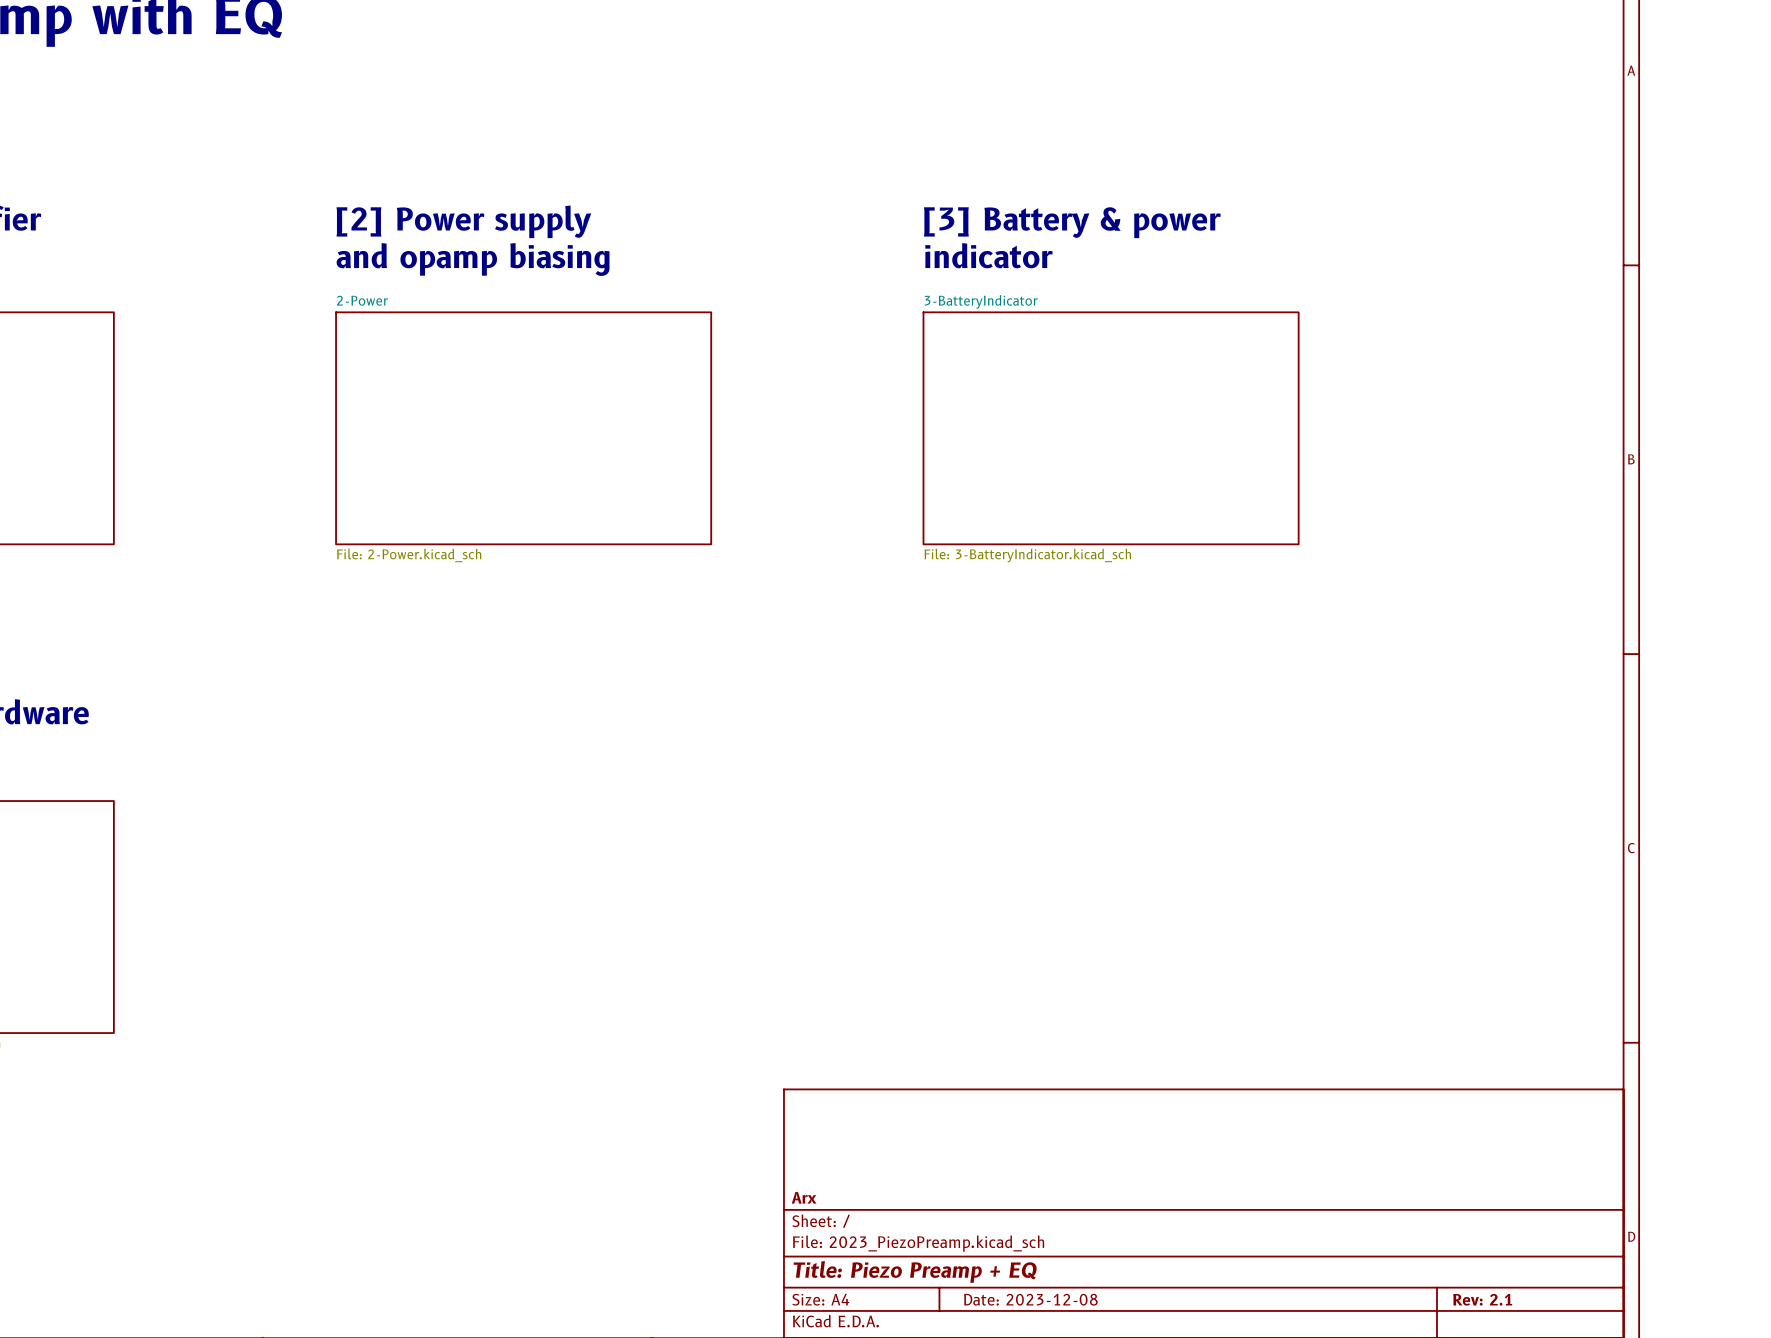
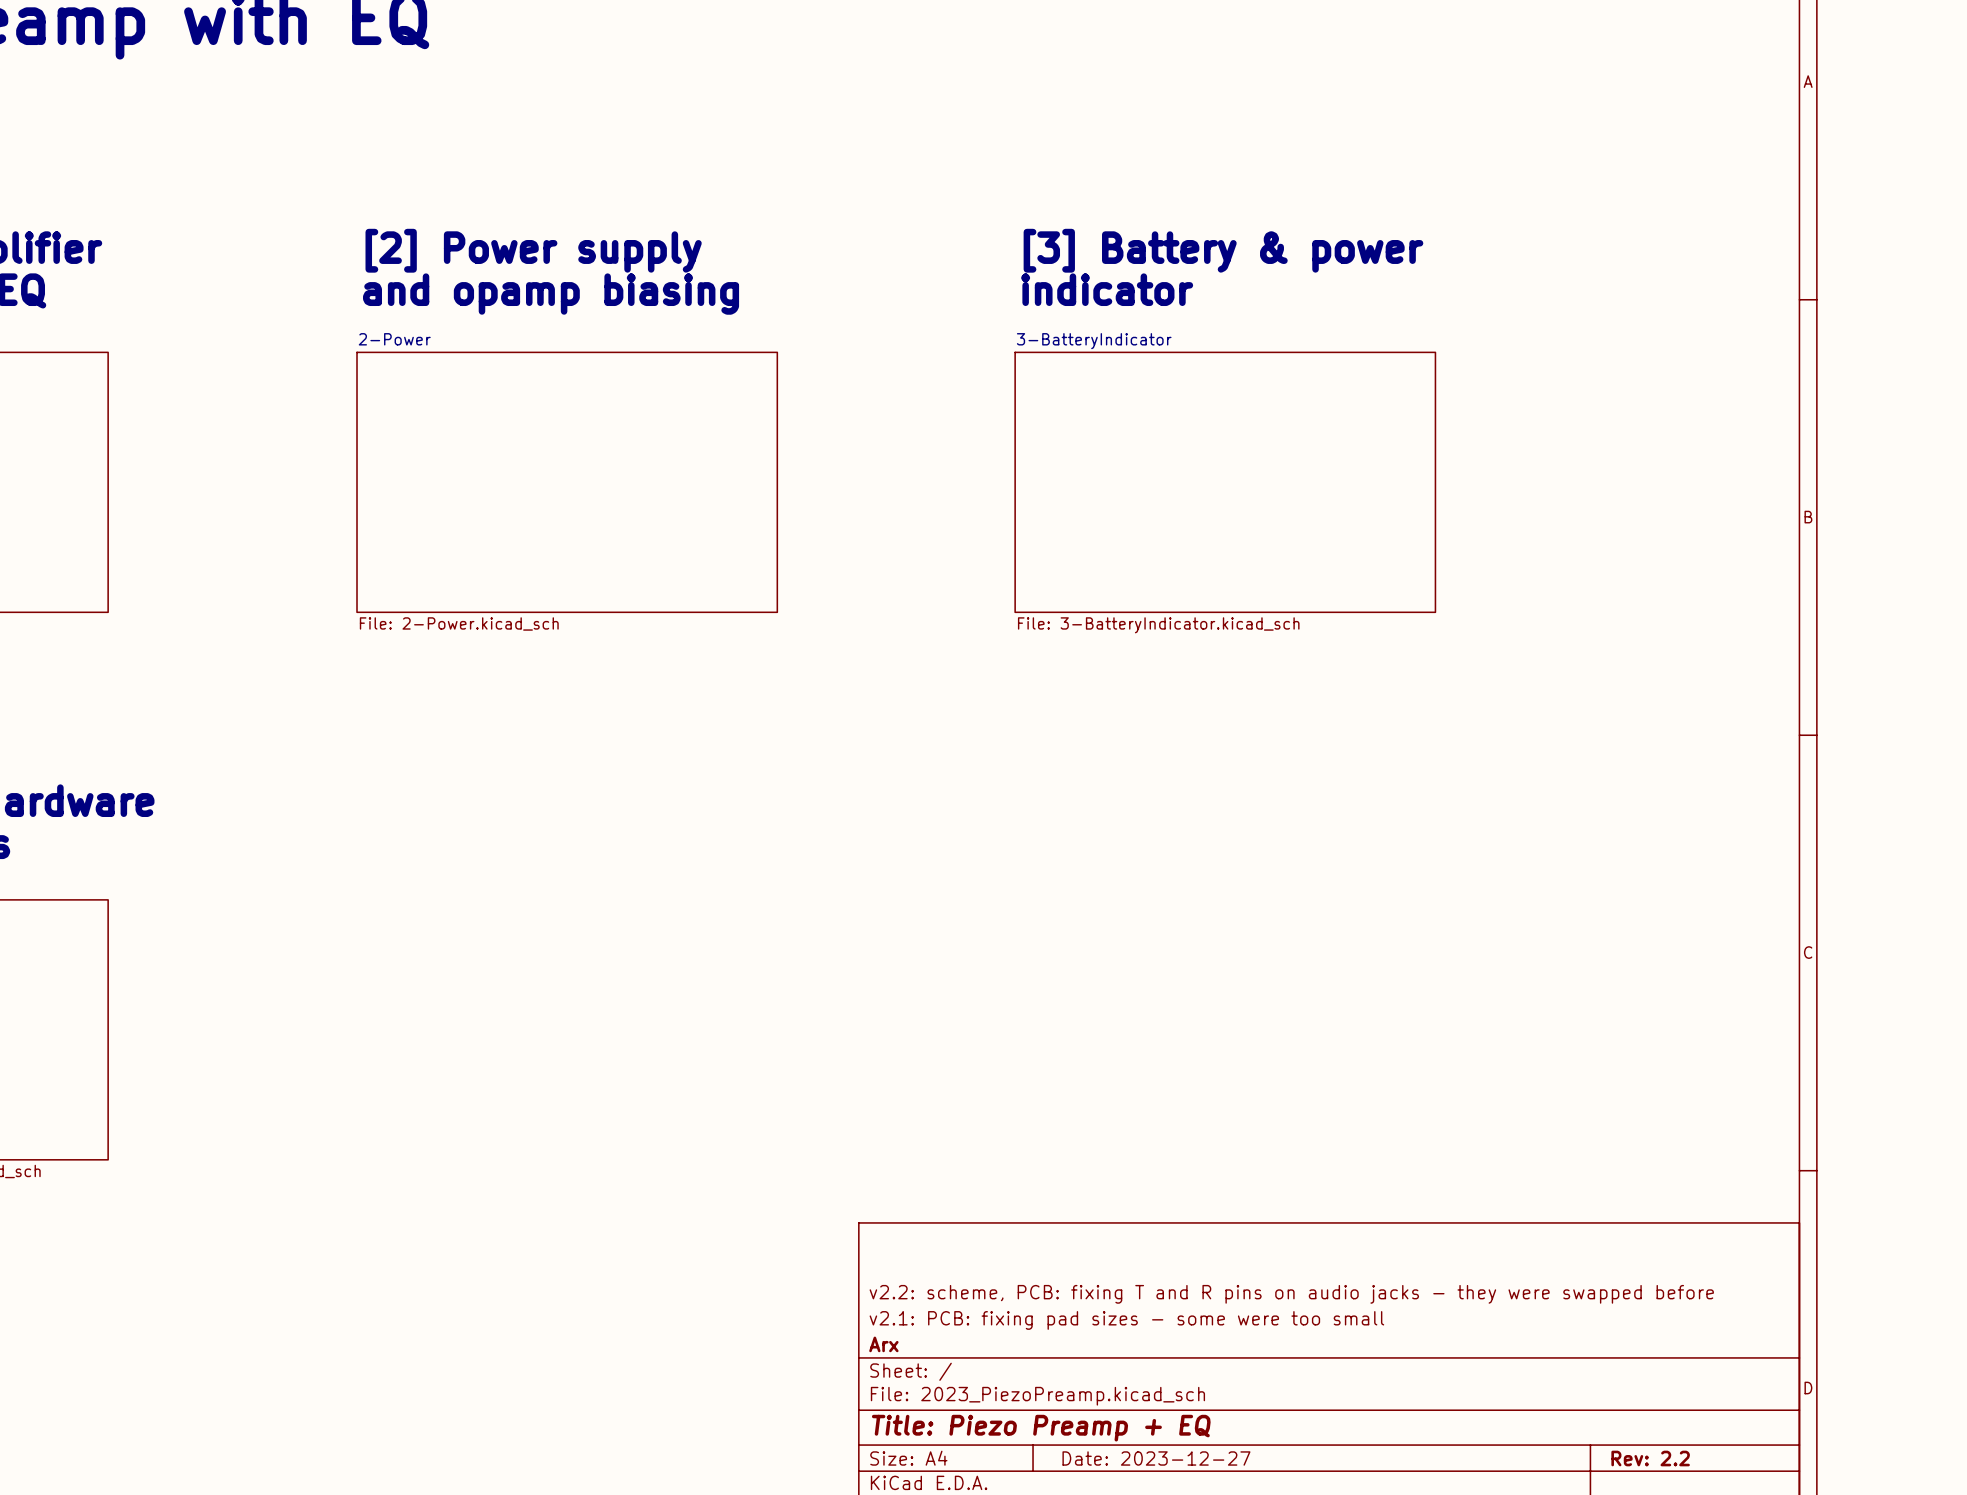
title block: none -> v2.2: scheme, PCB: fixing T and R pins on audio jacks - they were swapped before (1291, 1294)
title block: none -> v2.1: PCB: fixing pad sizes - some were too small (1126, 1320)
title block: Date: 2023-12-08 (1030, 1299) -> Date: 2023-12-27 (1156, 1458)
title block: Rev: 2.1 (1482, 1299) -> Rev: 2.2 (1650, 1458)

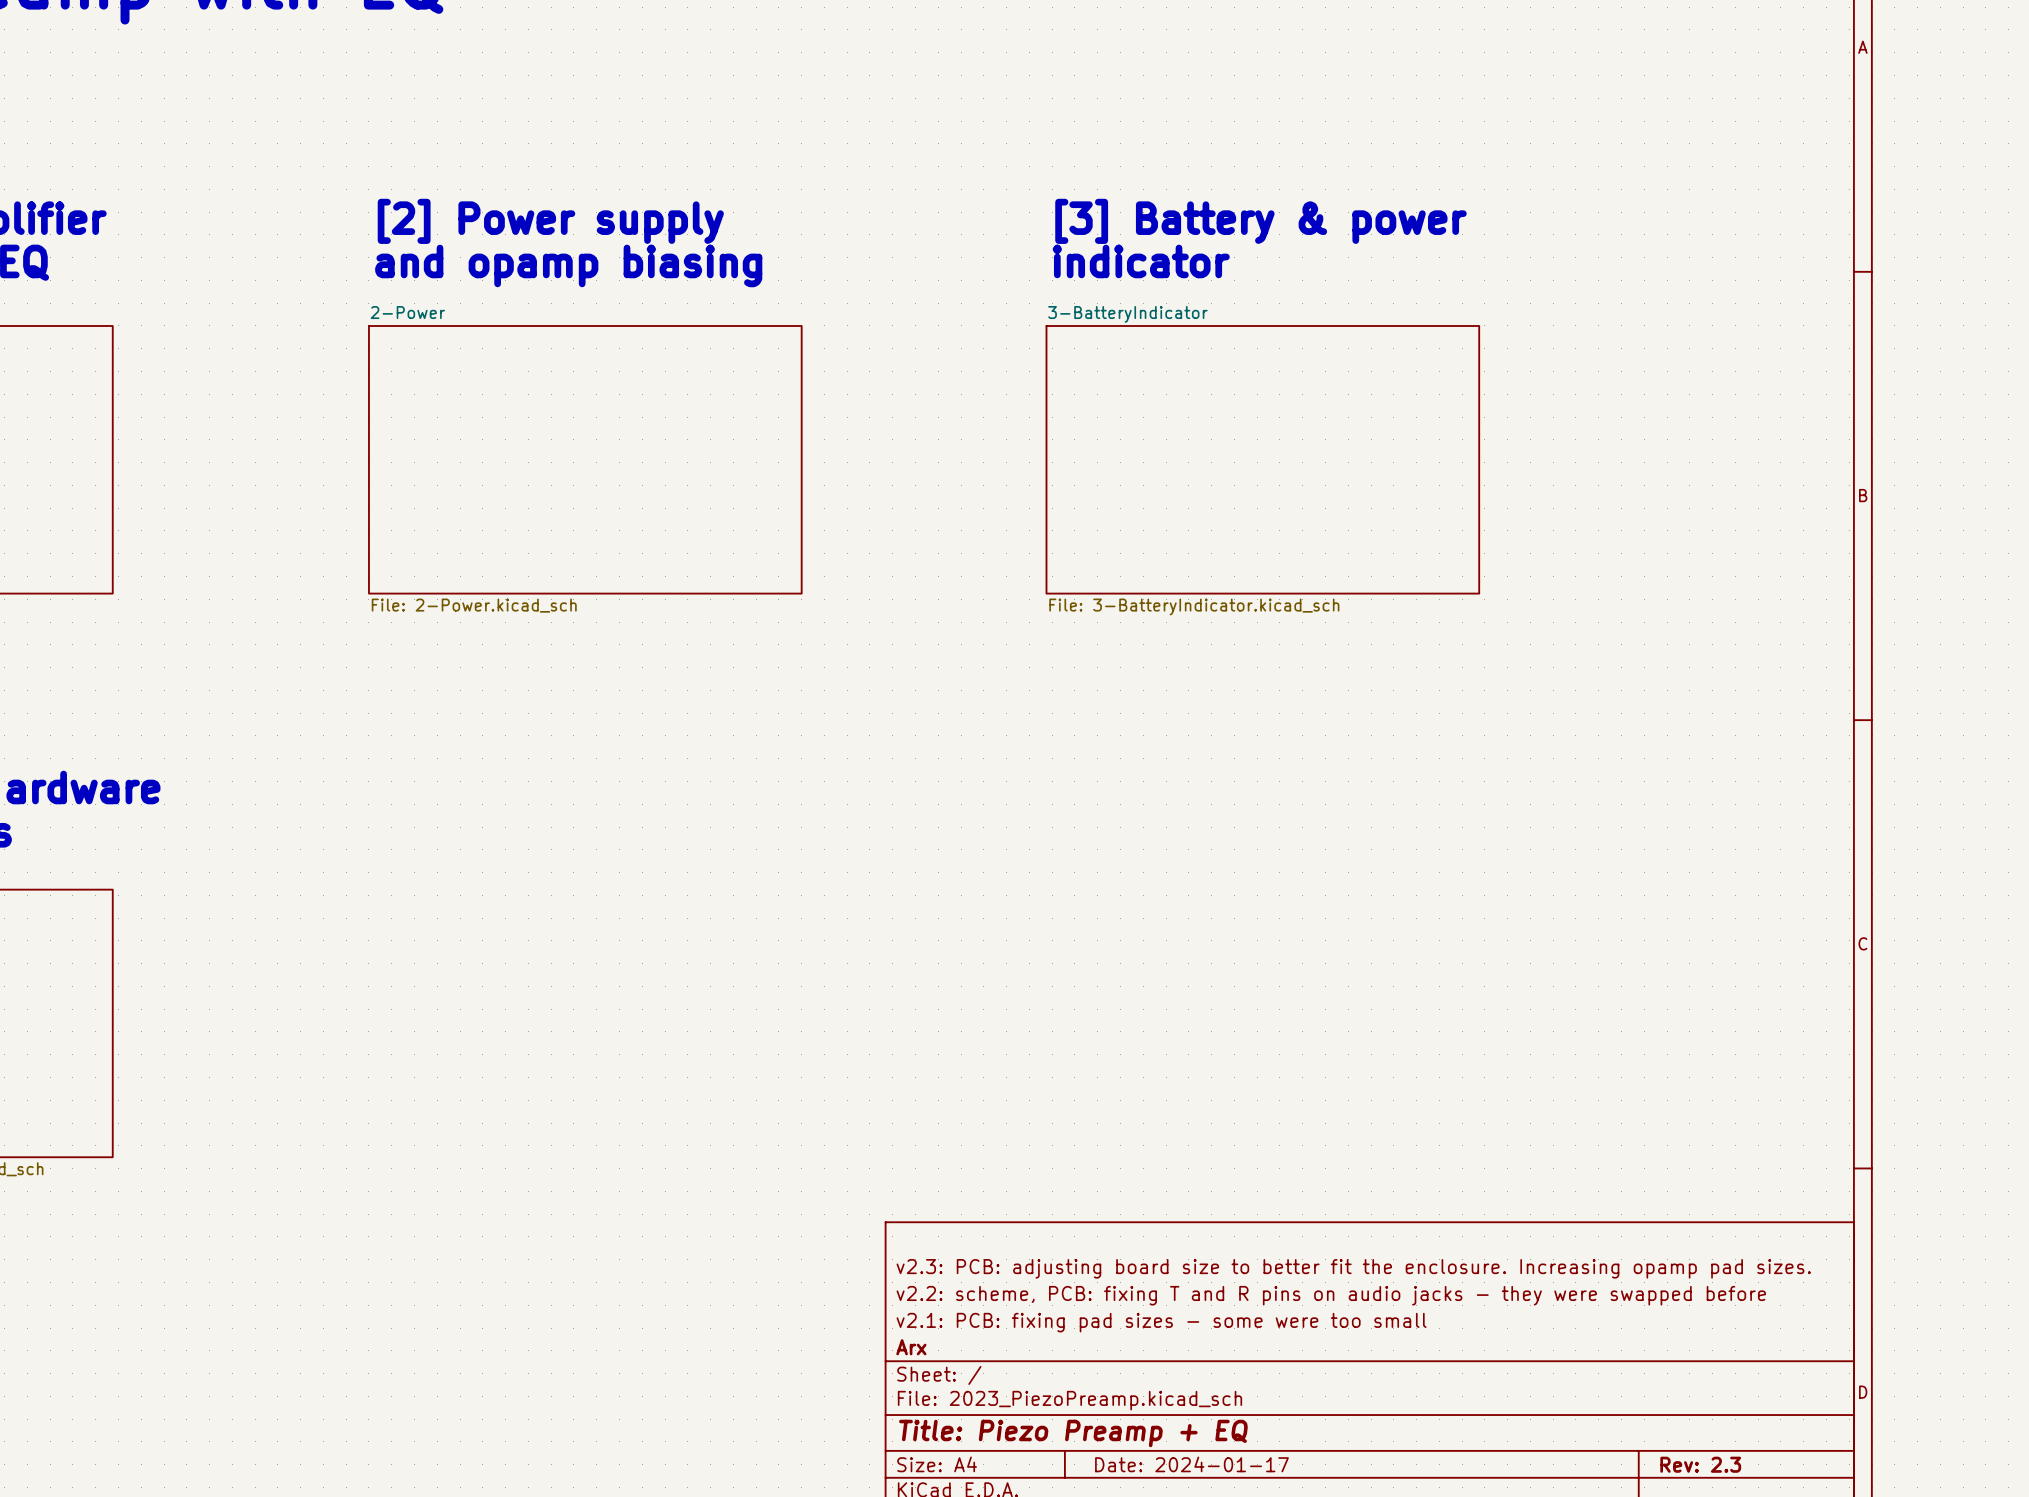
title block: none -> v2.3: PCB: adjusting board size to better fit the enclosure. Increasing opamp pad sizes. (1353, 1268)
title block: Date: 2023-12-27 (1156, 1458) -> Date: 2024-01-17 (1191, 1464)
title block: Rev: 2.2 (1650, 1458) -> Rev: 2.3 (1700, 1464)

